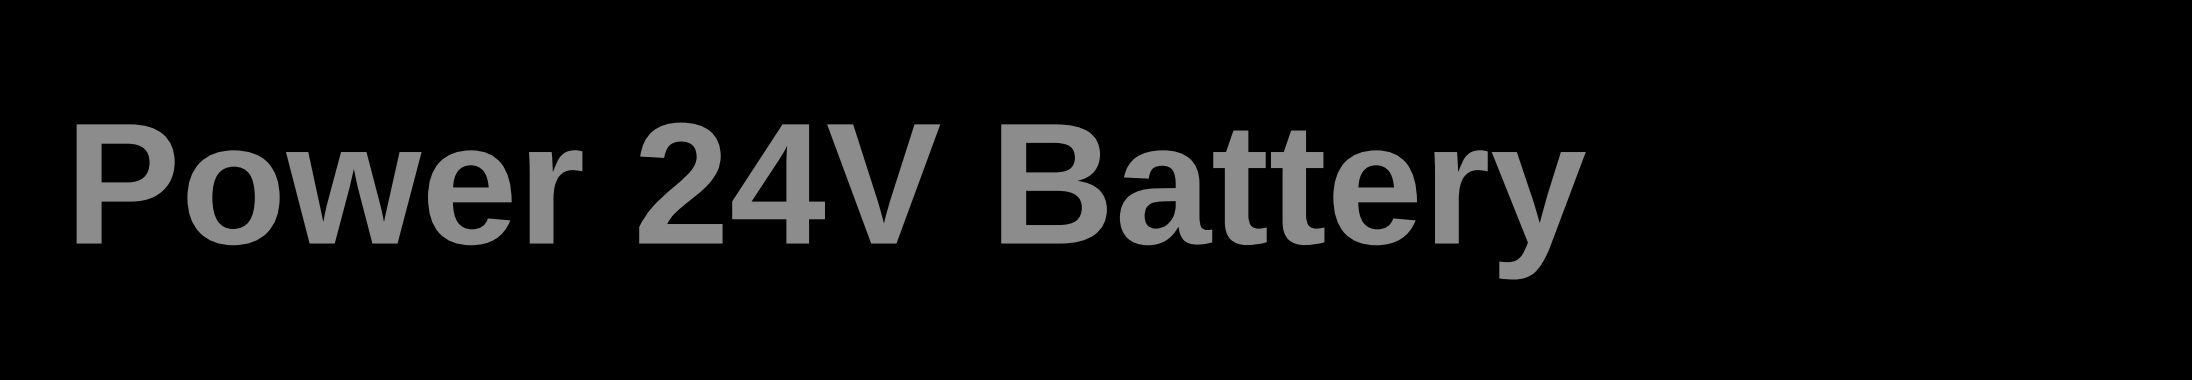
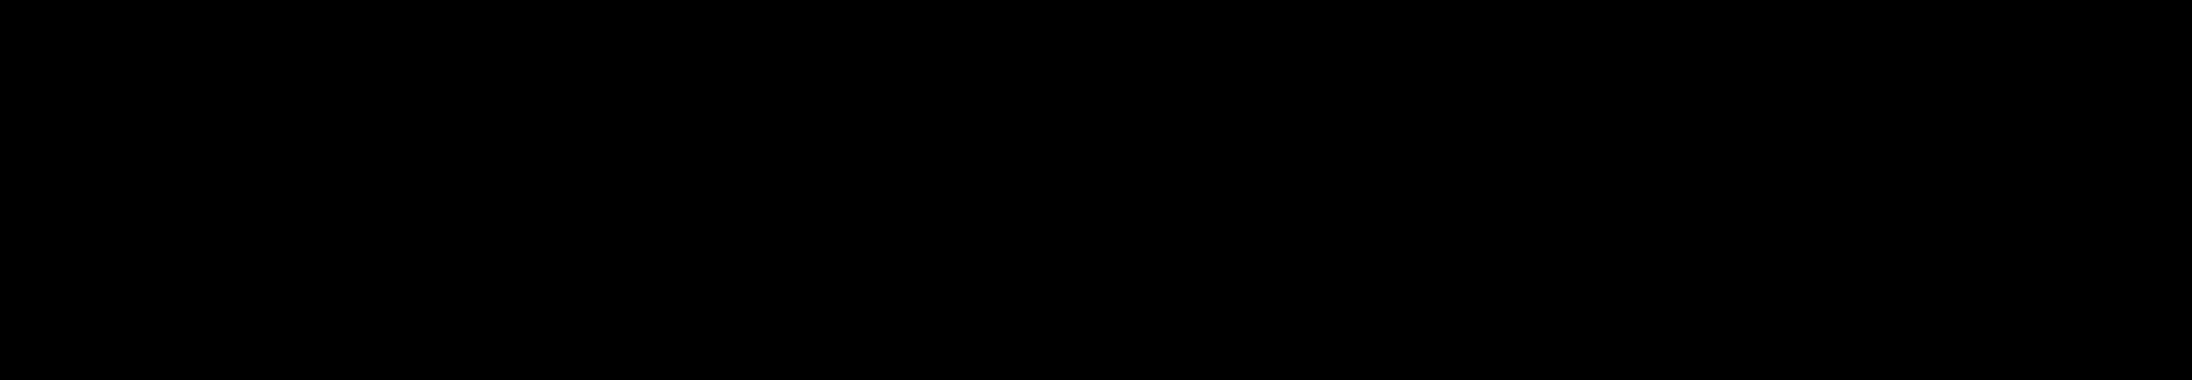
text: Power 24V Battery (831, 201) -> none

